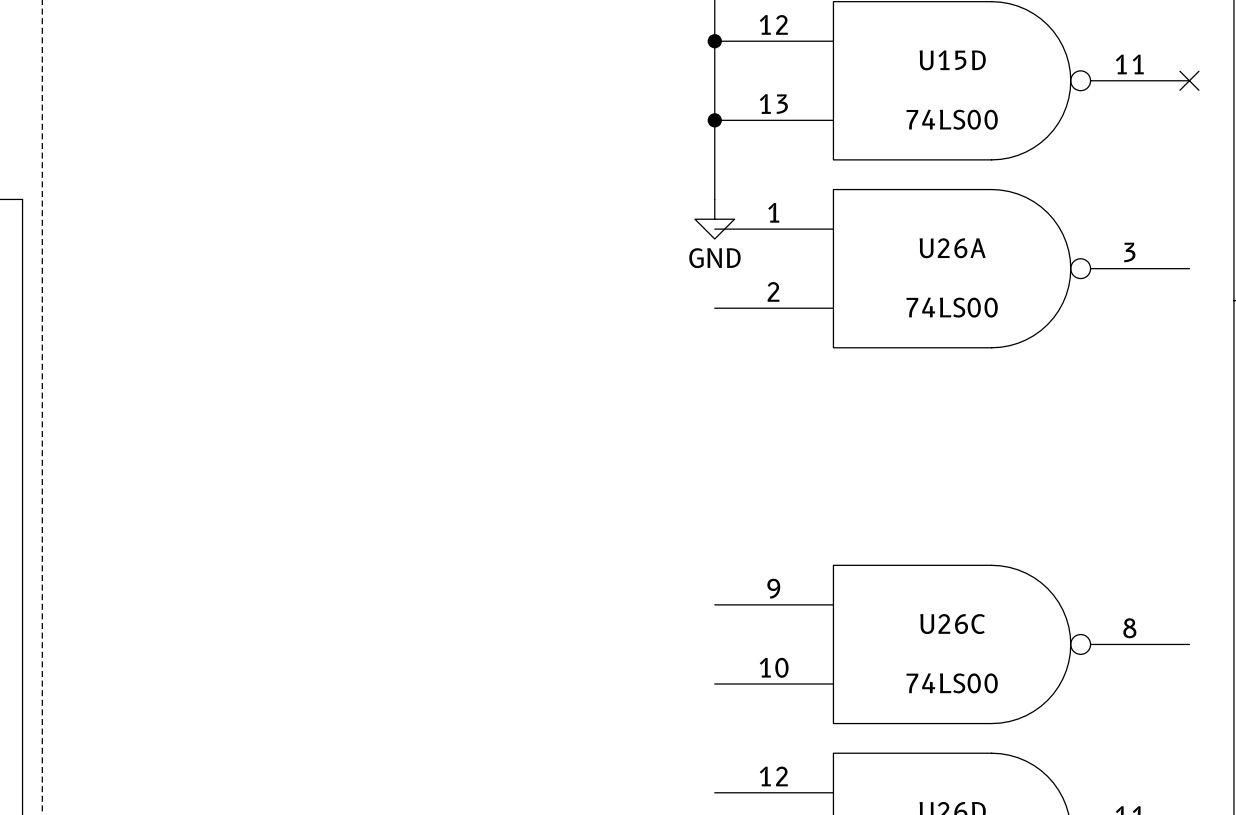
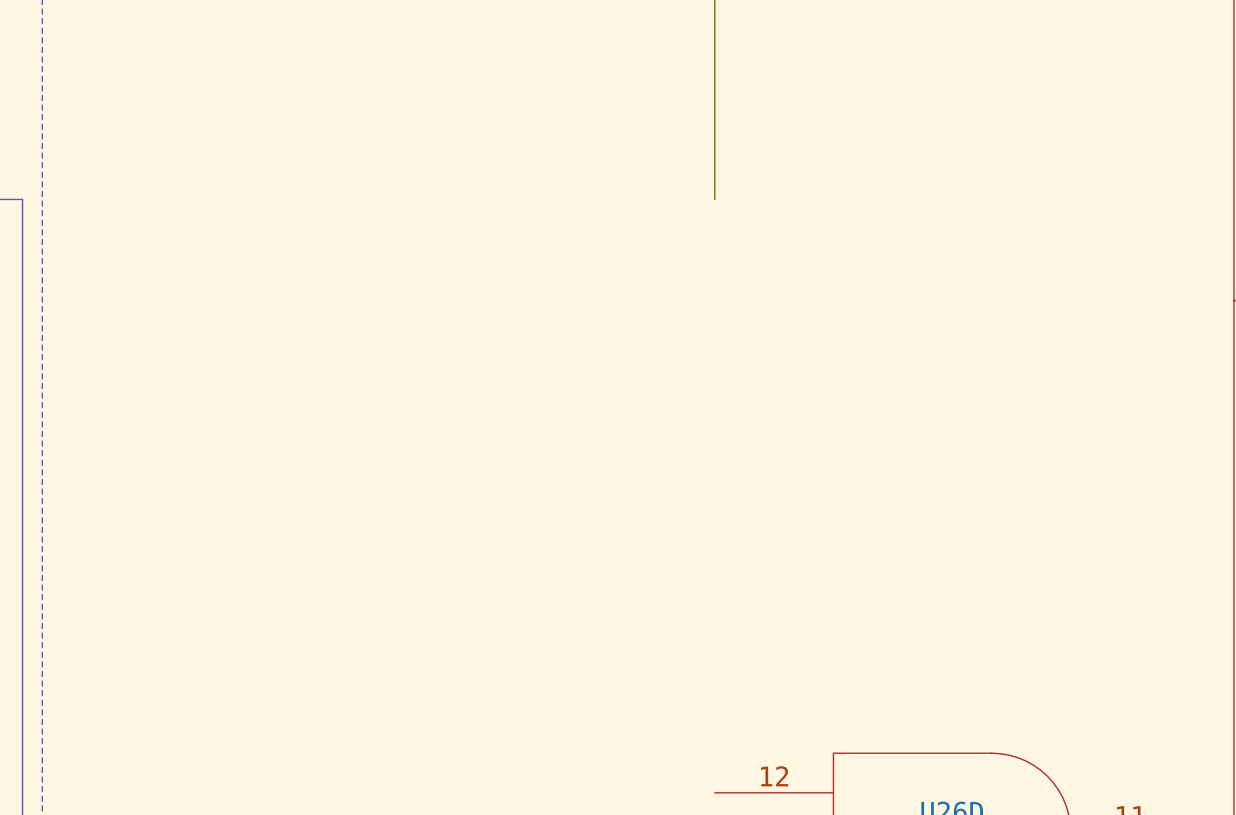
junction: (714, 41) -> none
U15D: 74LS00 (952, 80) -> none
no-connect mark: (1189, 80) -> none
junction: (714, 120) -> none
power symbol: GND (714, 219) -> none
U26A: 74LS00 (952, 268) -> none
U26C: 74LS00 (952, 644) -> none

